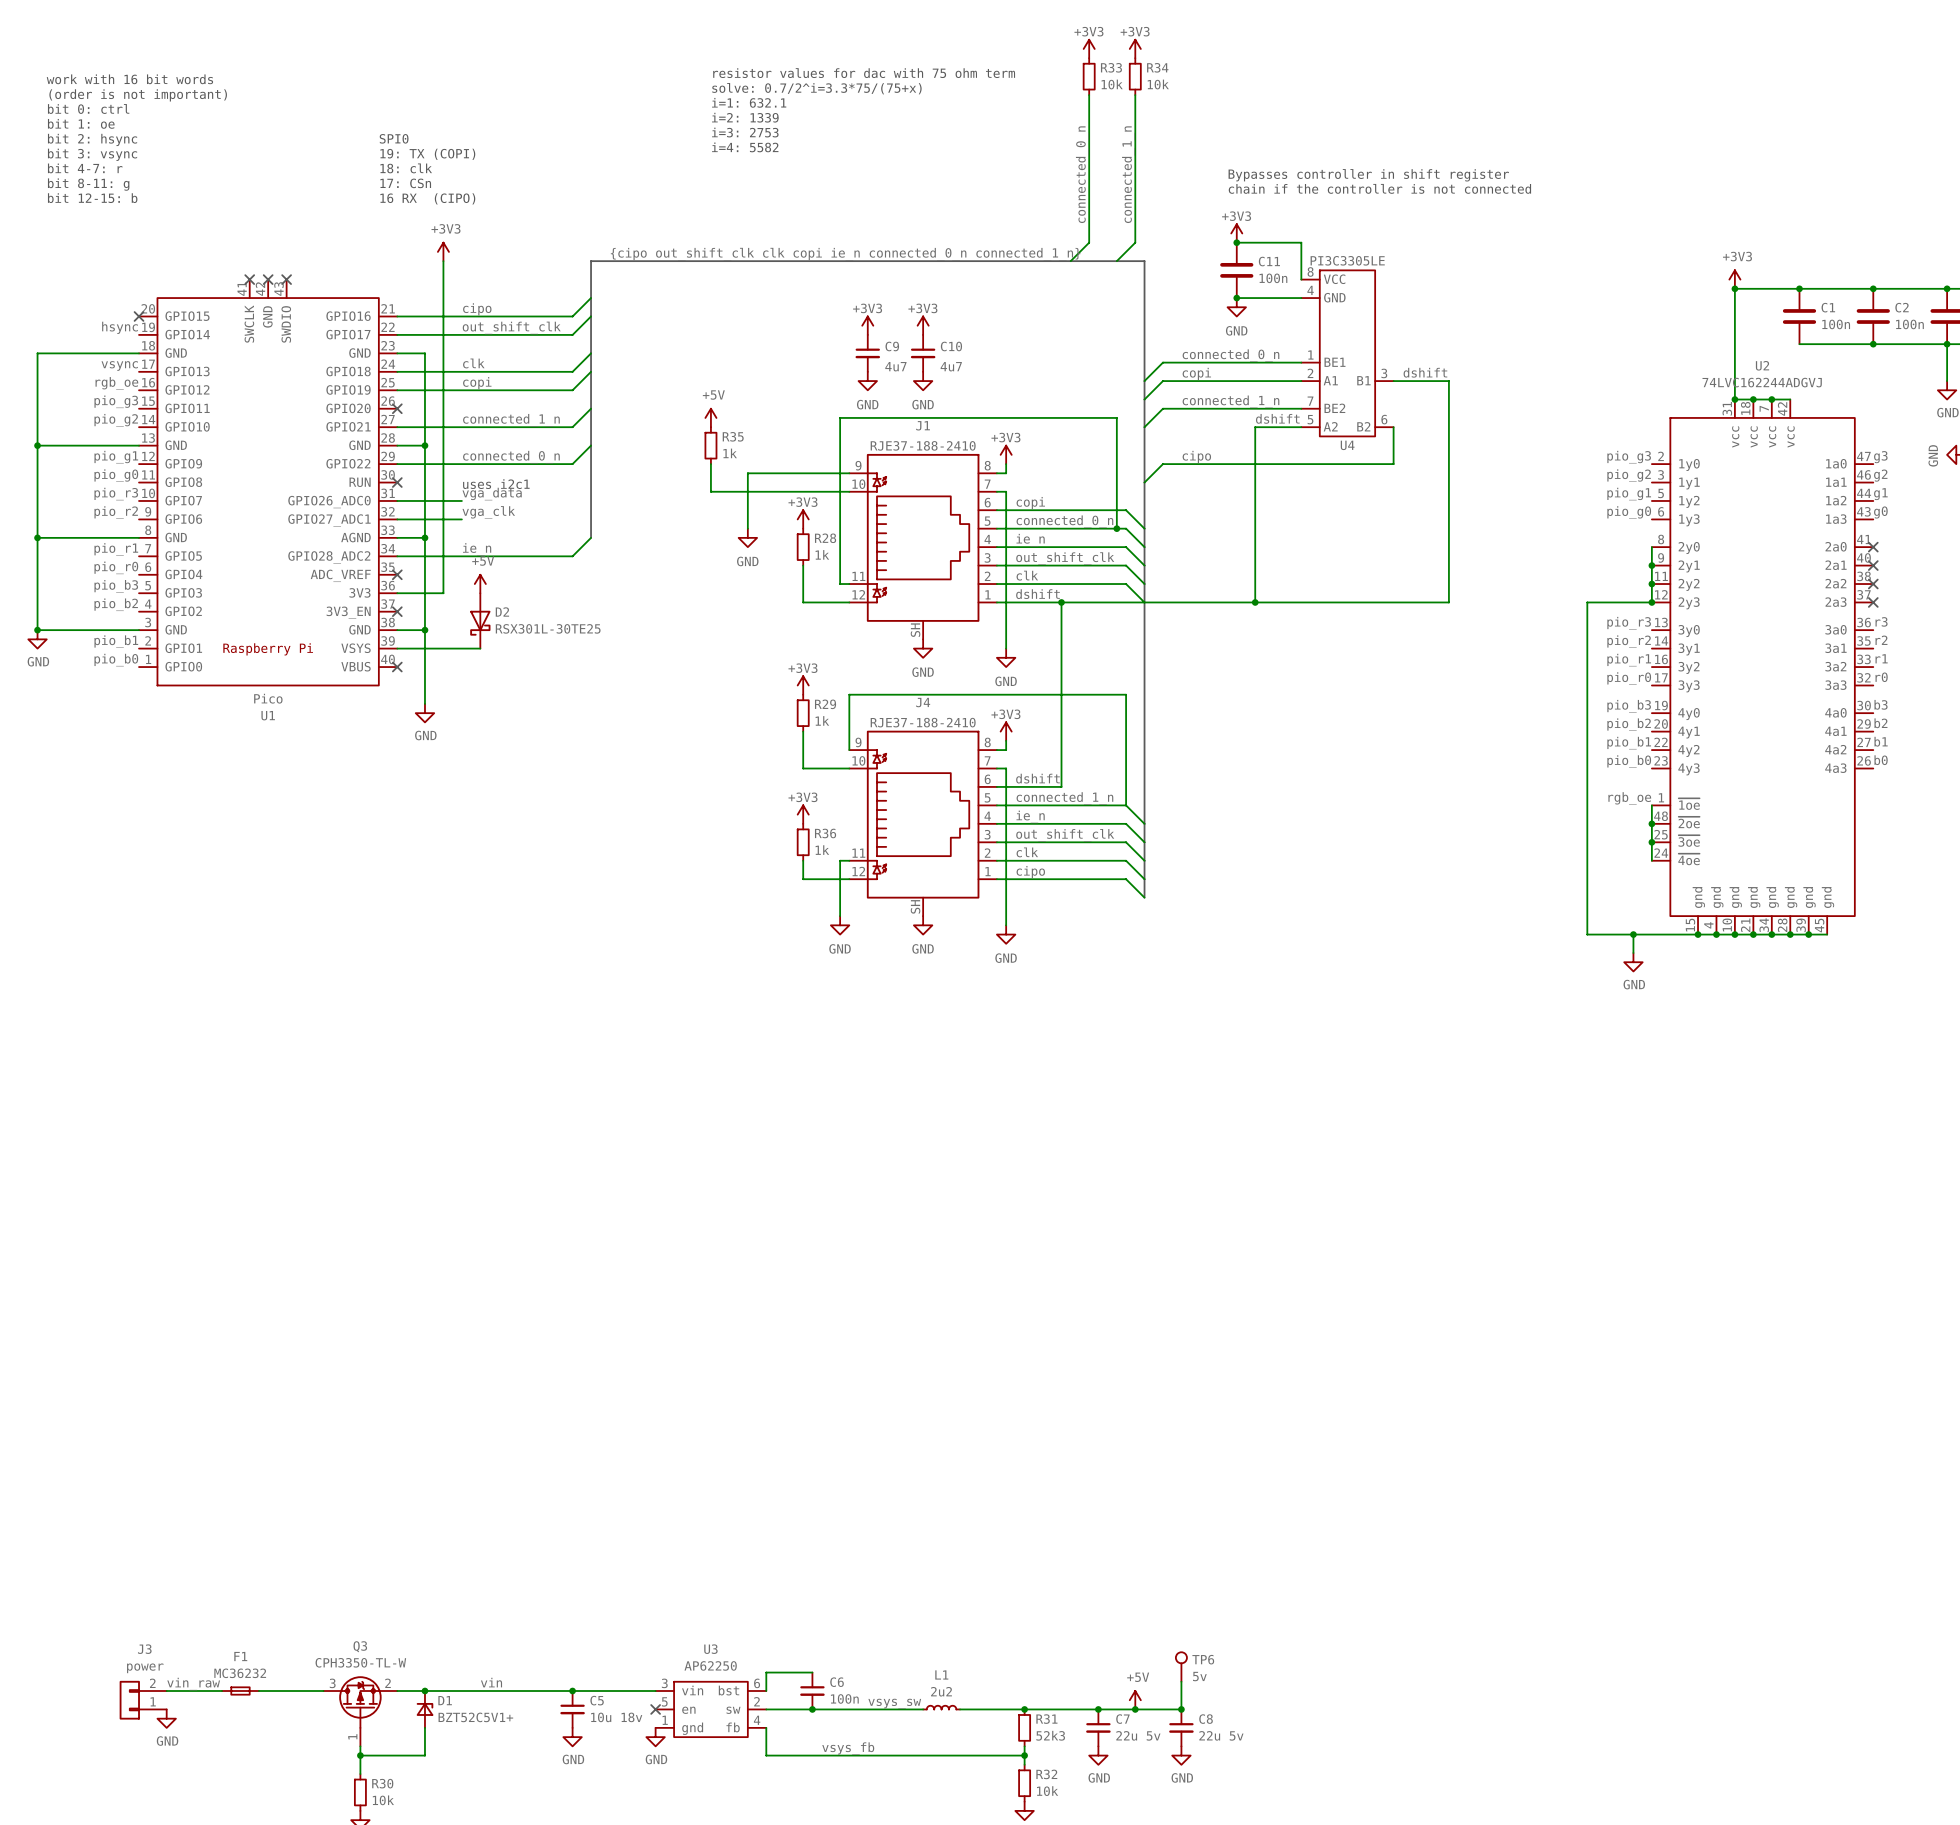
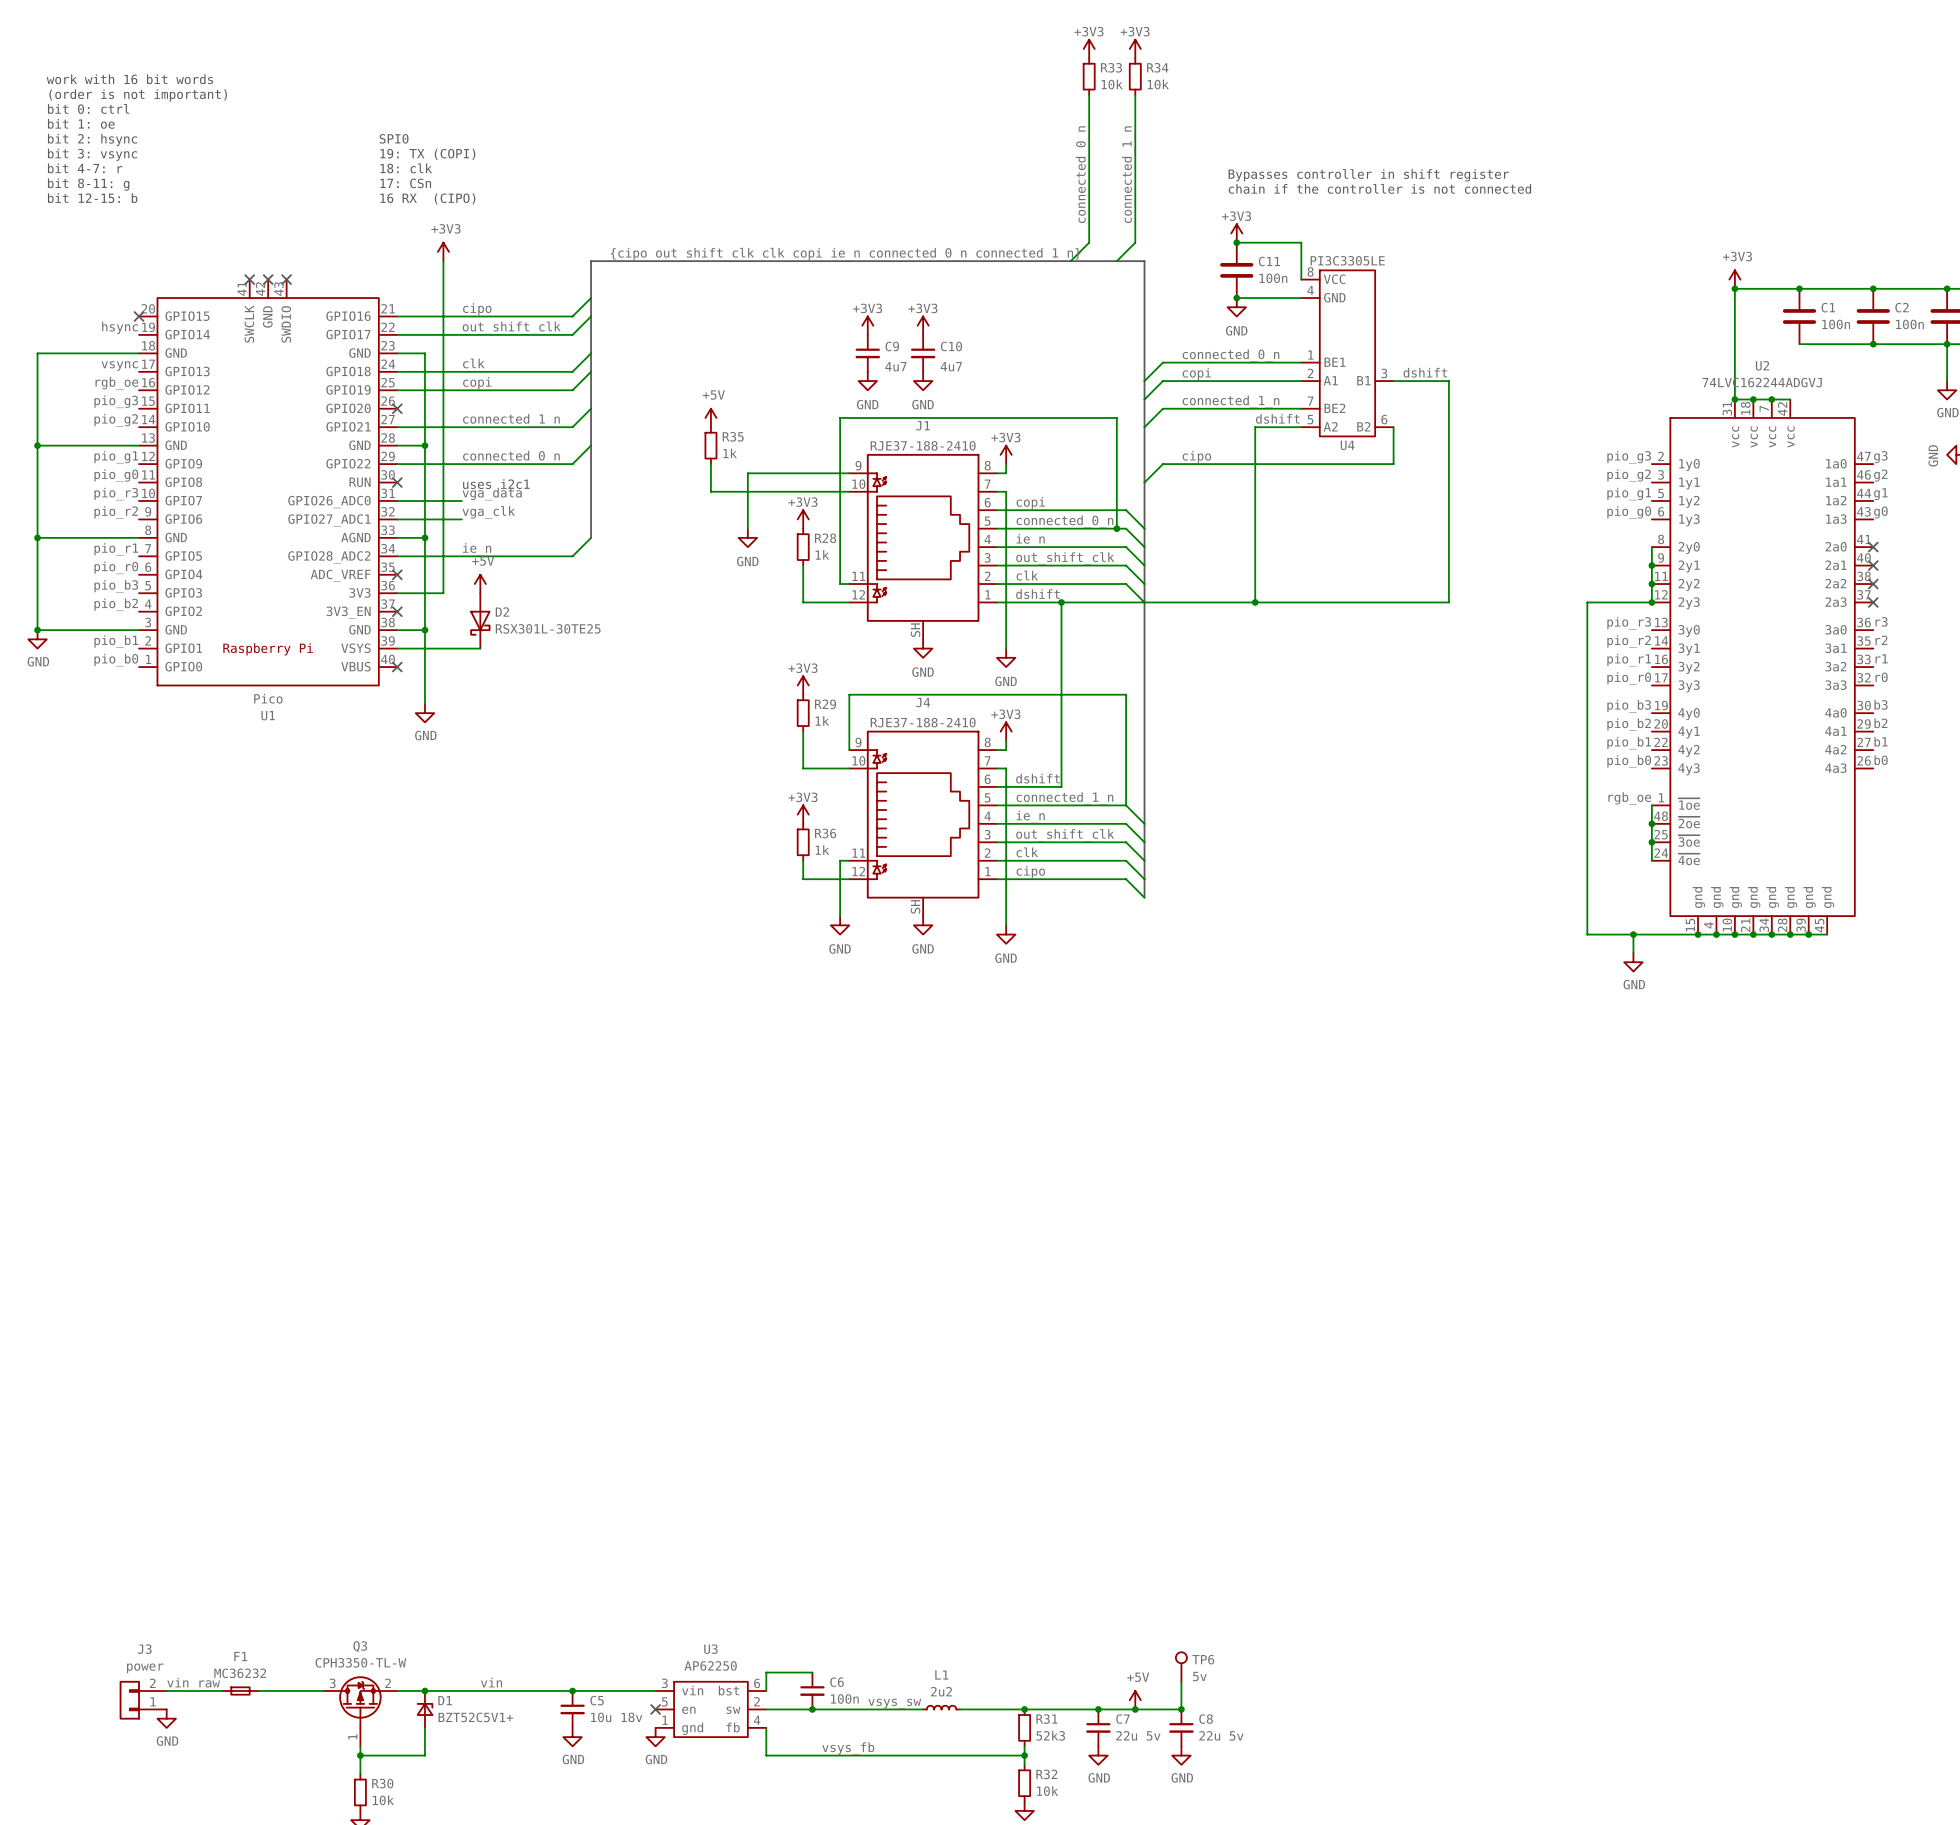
text: resistor values for dac with 75 ohm term (864, 73) -> none
text: solve: 0.7/2^i=3.3*75/(75+x) (816, 88) -> none
text: i=1: 632.1 (749, 102) -> none
text: i=2: 1339 (745, 117) -> none
text: i=3: 2753 (745, 132) -> none
text: i=4: 5582 (745, 147) -> none

